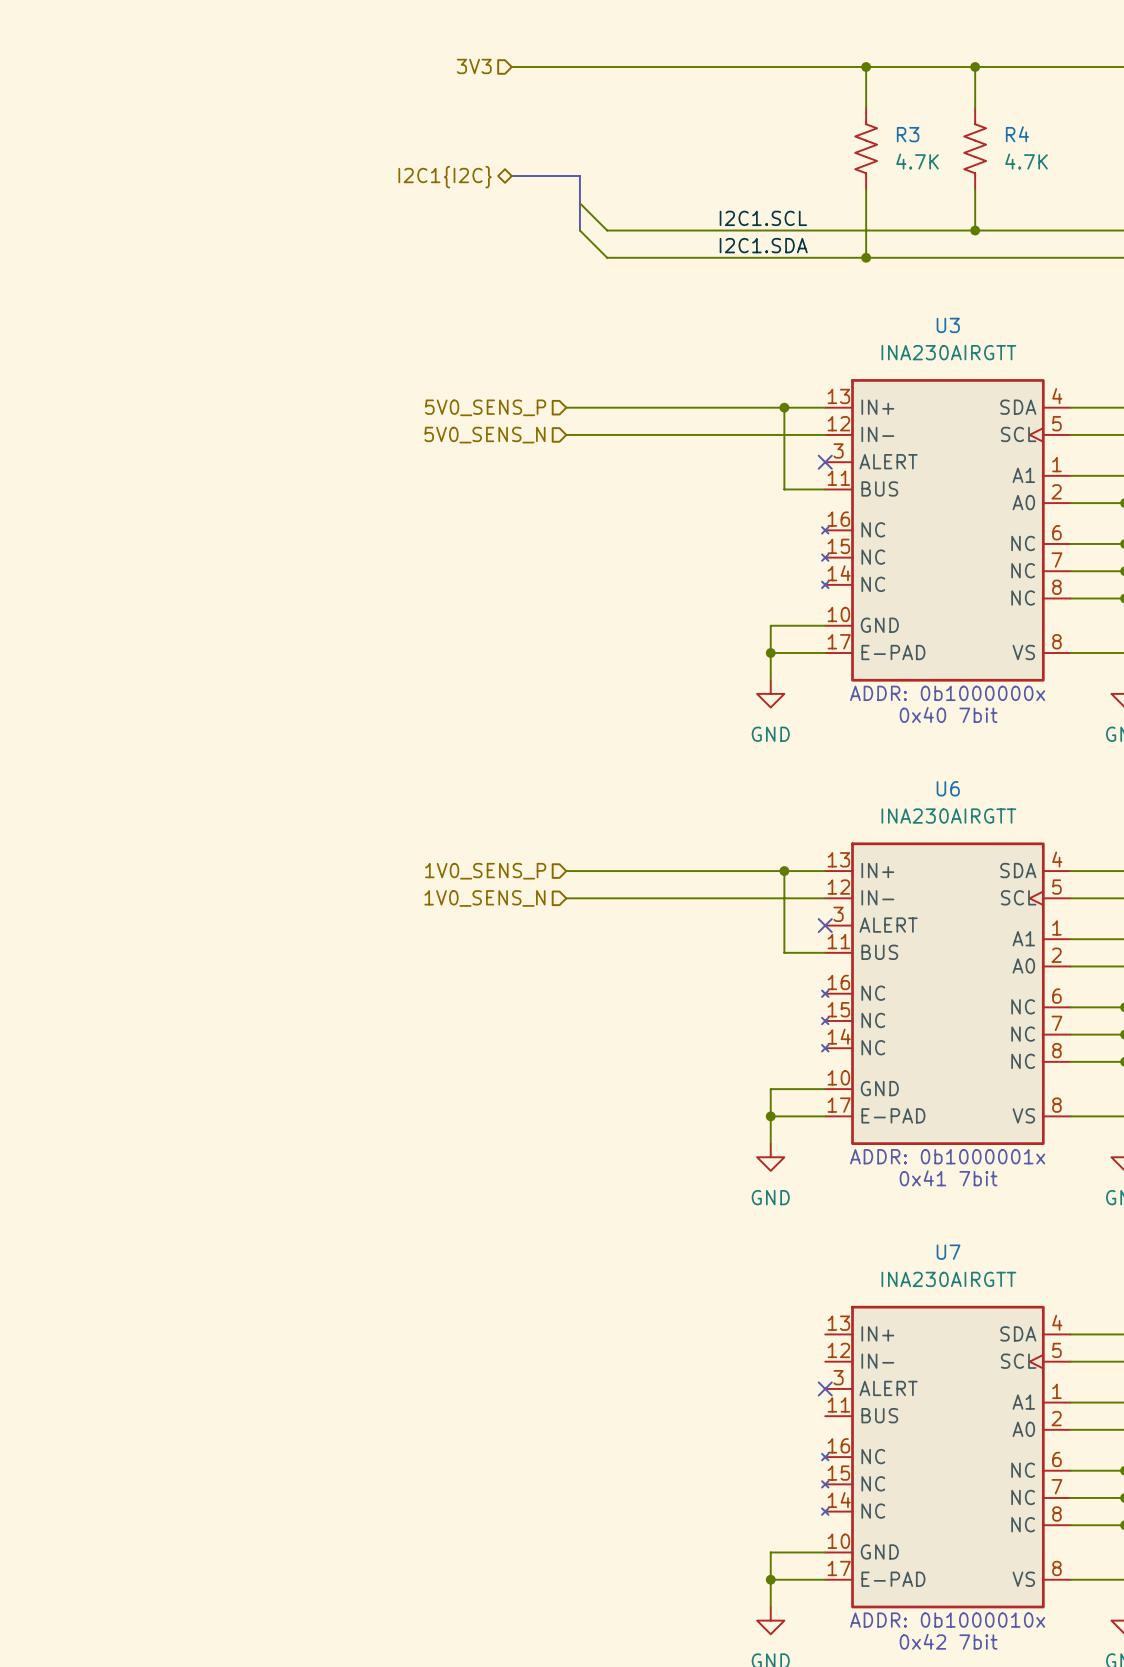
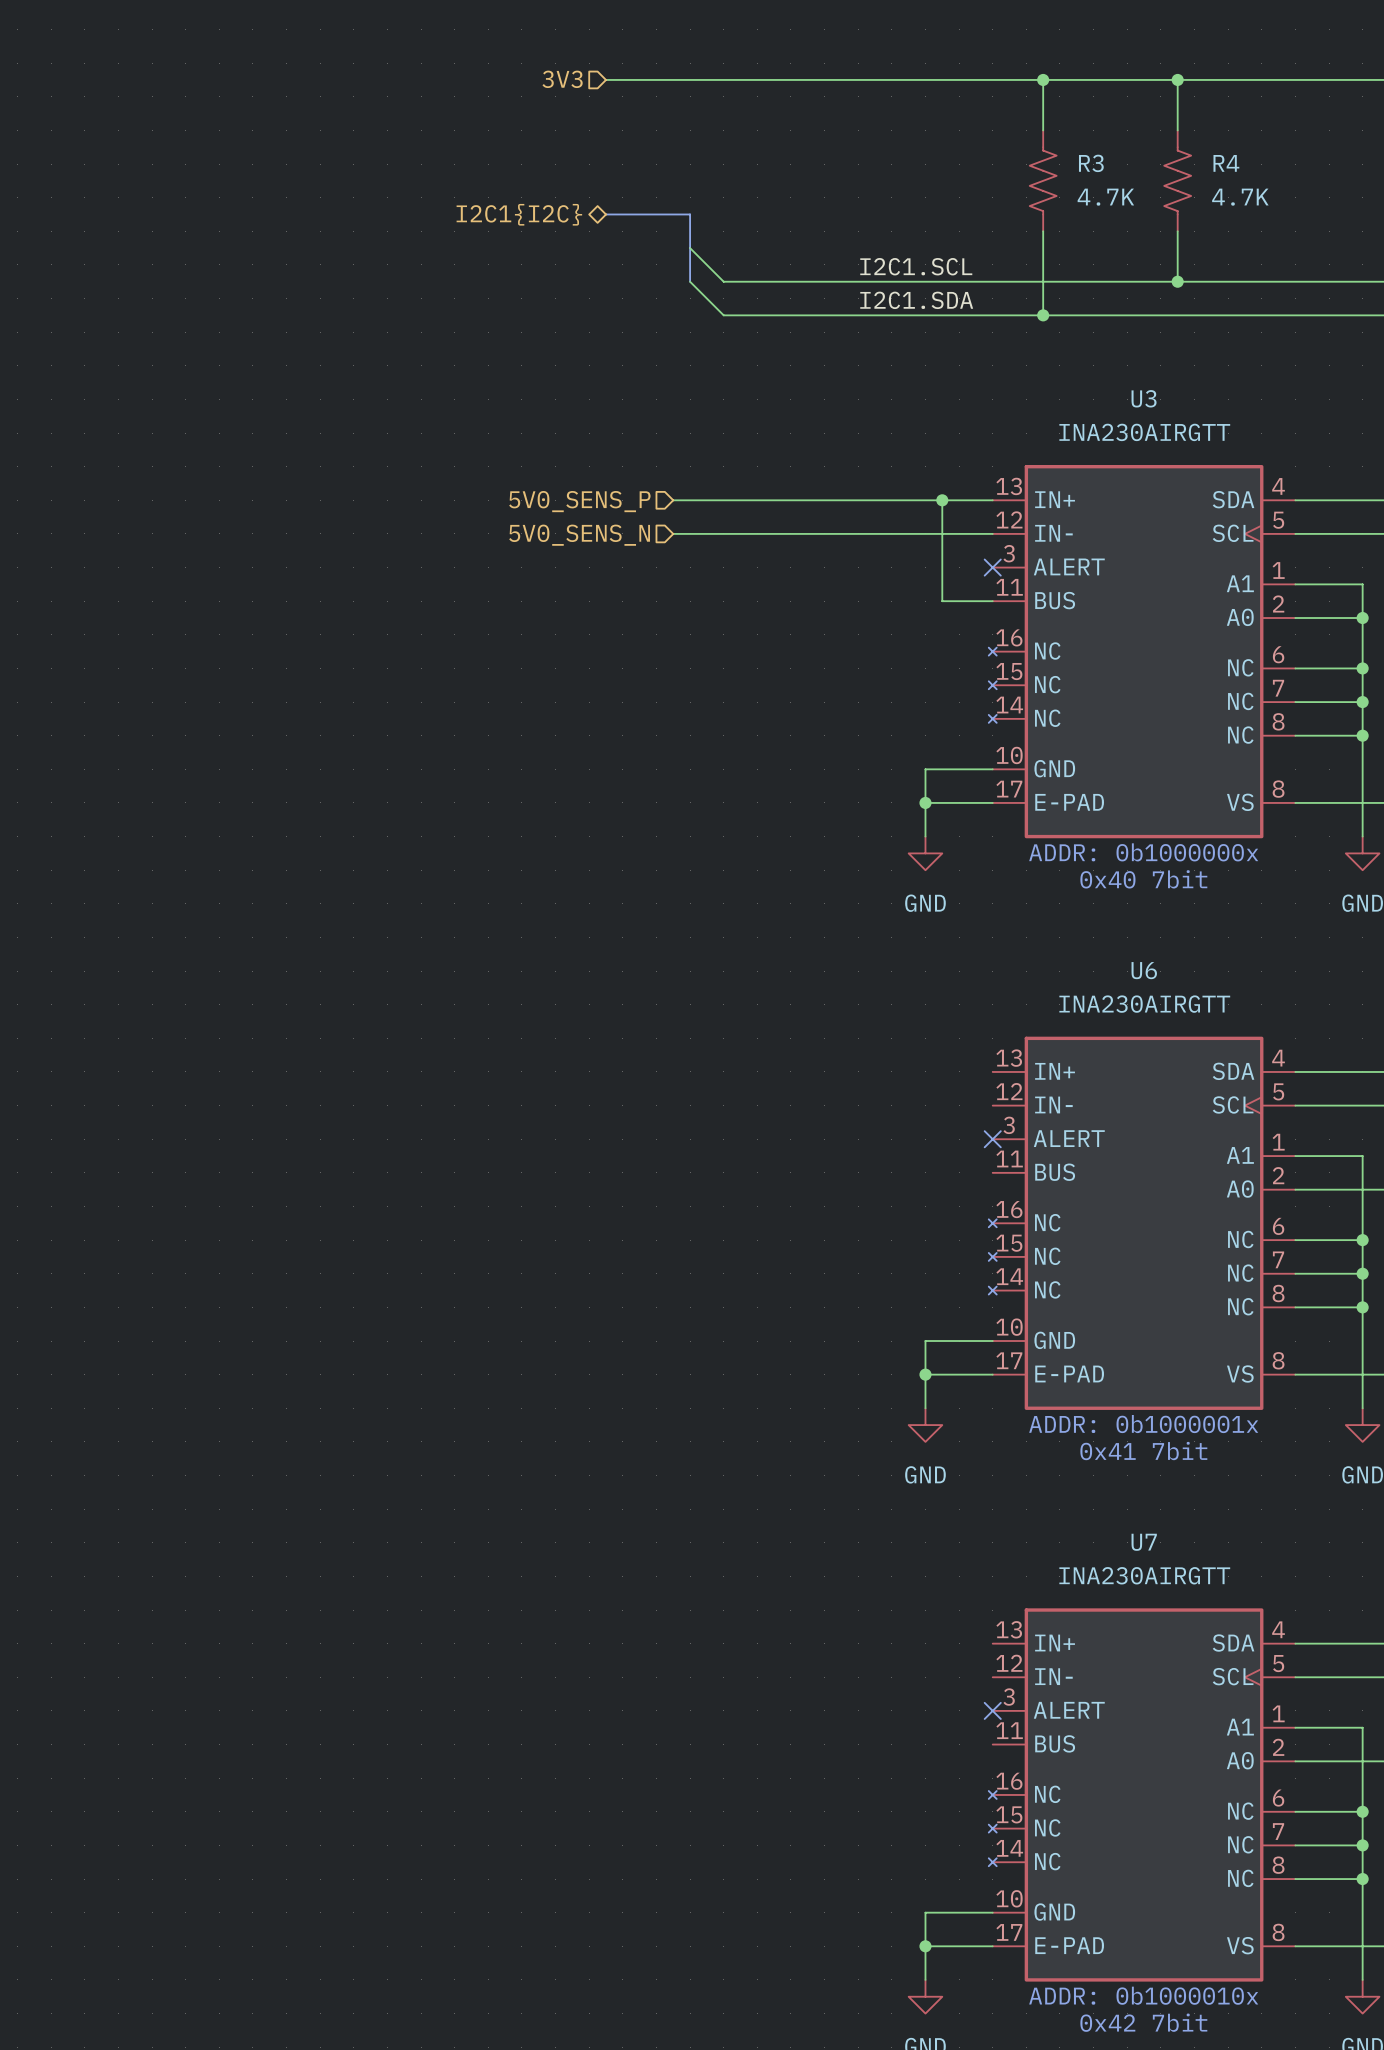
hierarchical label: 1V0_SENS_P (485, 871) -> none
wire: (566, 871) (825, 871) -> none
wire: (784, 871) (784, 952) (825, 952) -> none
junction: (784, 871) -> none
hierarchical label: 1V0_SENS_N (484, 898) -> none
wire: (566, 898) (825, 898) -> none

